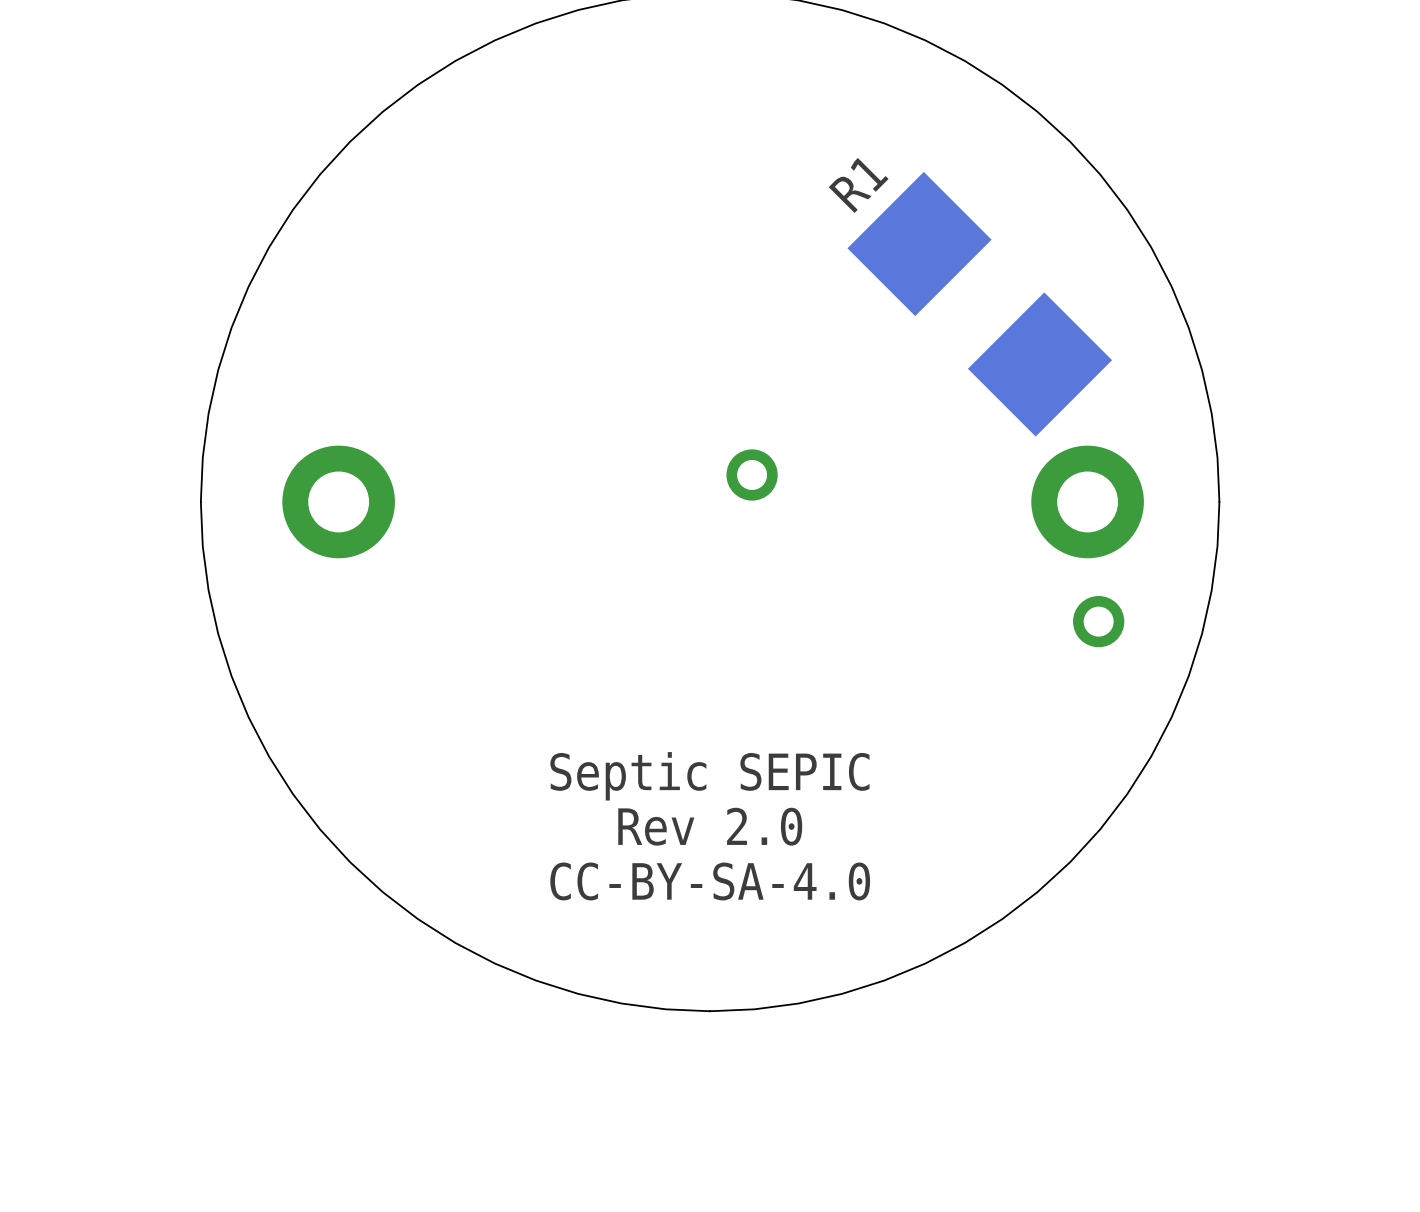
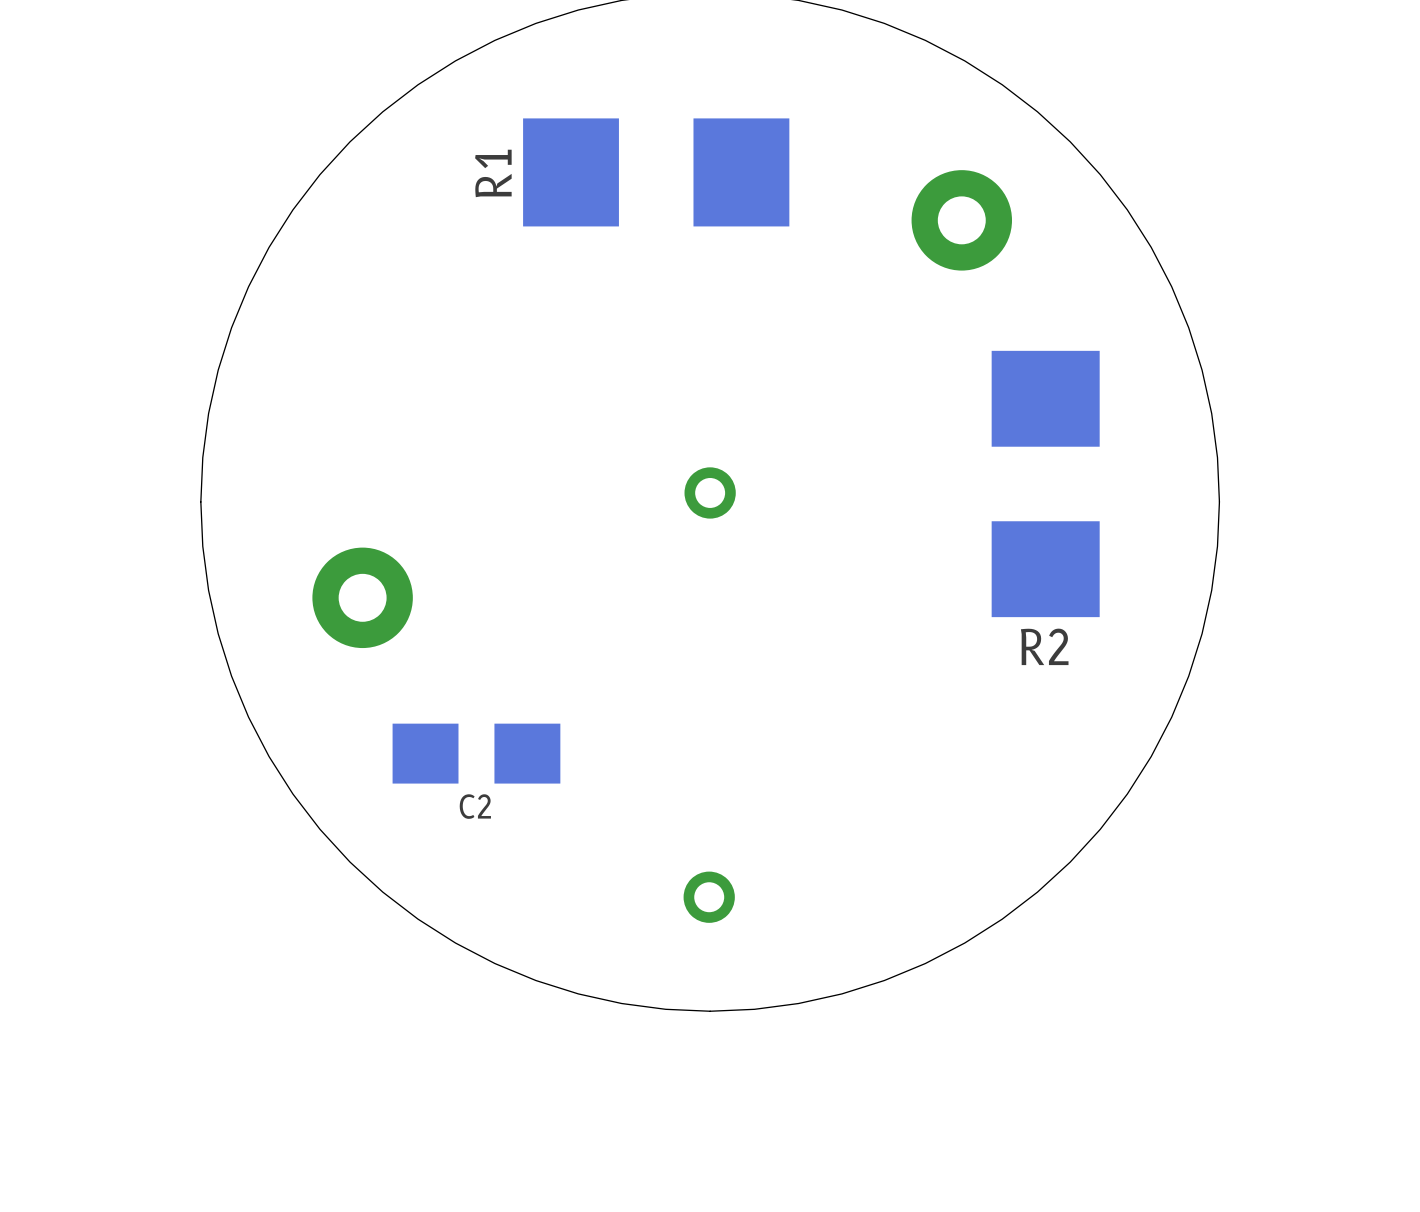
part: none -> (961, 220)
R1 rotation: 0° (979, 304) -> 45° counterclockwise (656, 172)
R1 position: (979, 304) -> (656, 172)
part position: (752, 475) -> (710, 492)
R2: none -> (1045, 483)
part: (338, 501) -> none
part: (1087, 501) -> none
part: none -> (362, 597)
part position: (1098, 621) -> (709, 897)
C2: none -> (476, 753)
text: Septic SEPIC (709, 776) -> none
text: Rev 2.0 (710, 826) -> none
text: CC-BY-SA-4.0 (710, 881) -> none

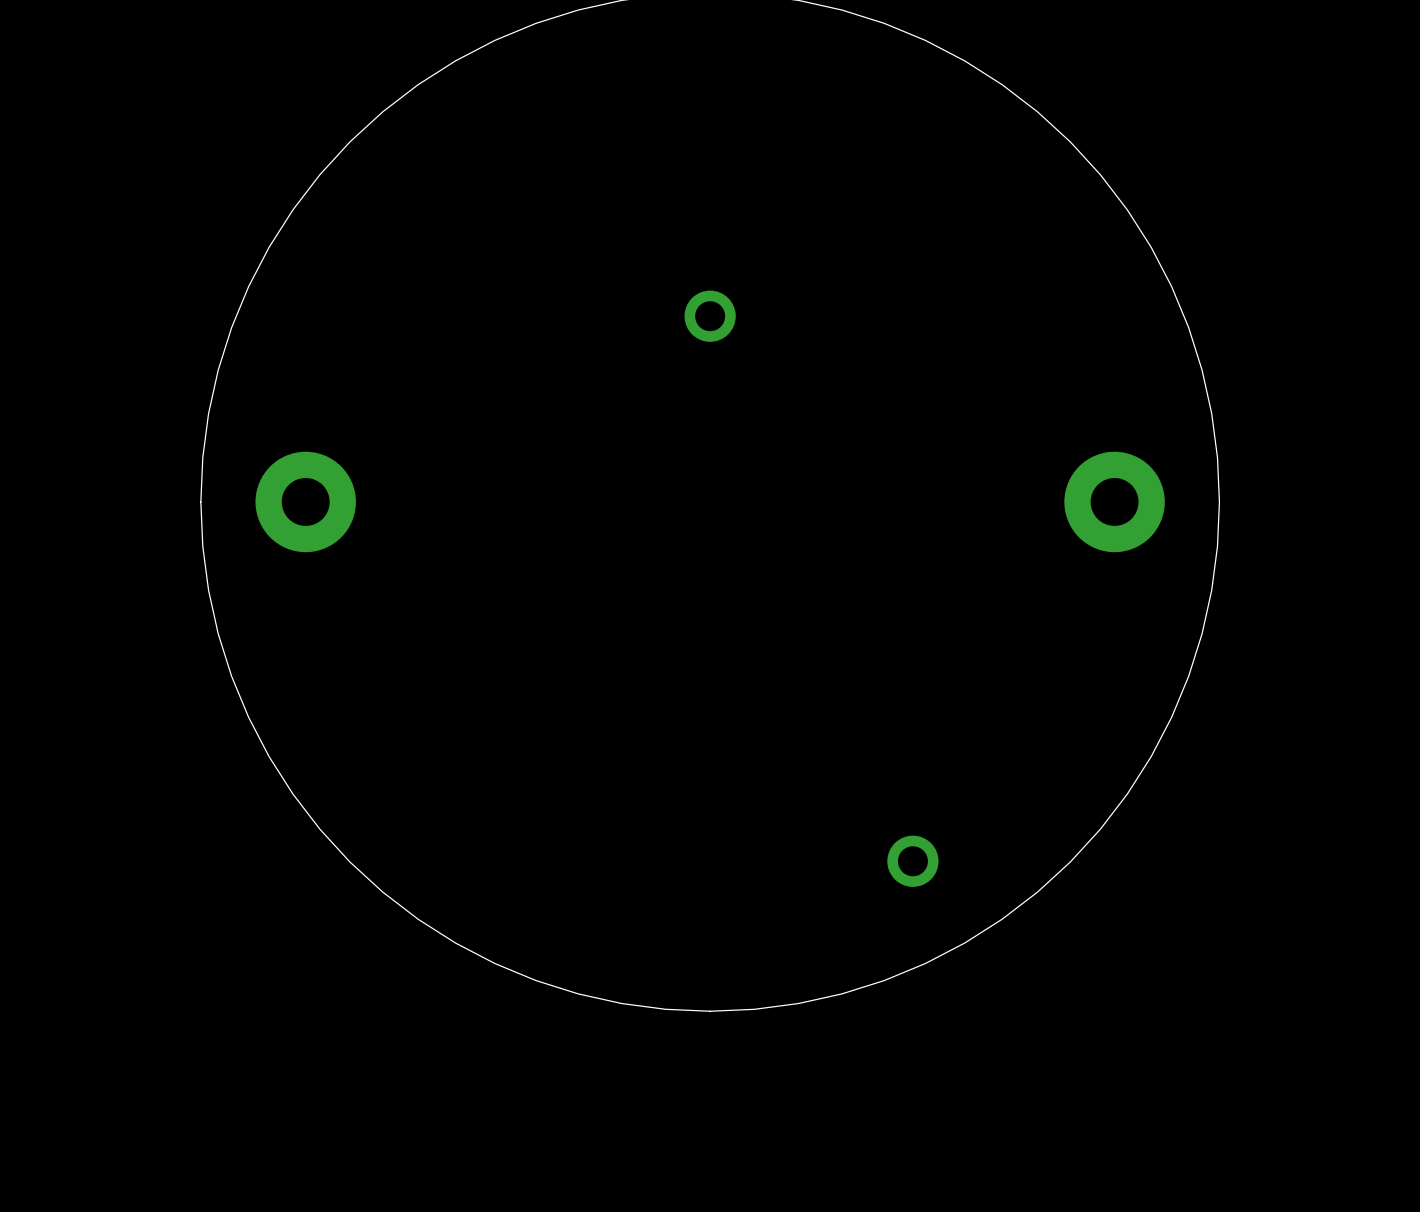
R1: (656, 172) -> none
part position: (961, 220) -> (1114, 501)
R2: (1045, 483) -> none
part position: (710, 492) -> (710, 316)
part position: (362, 597) -> (305, 501)
C2: (476, 753) -> none
part position: (709, 897) -> (912, 861)

